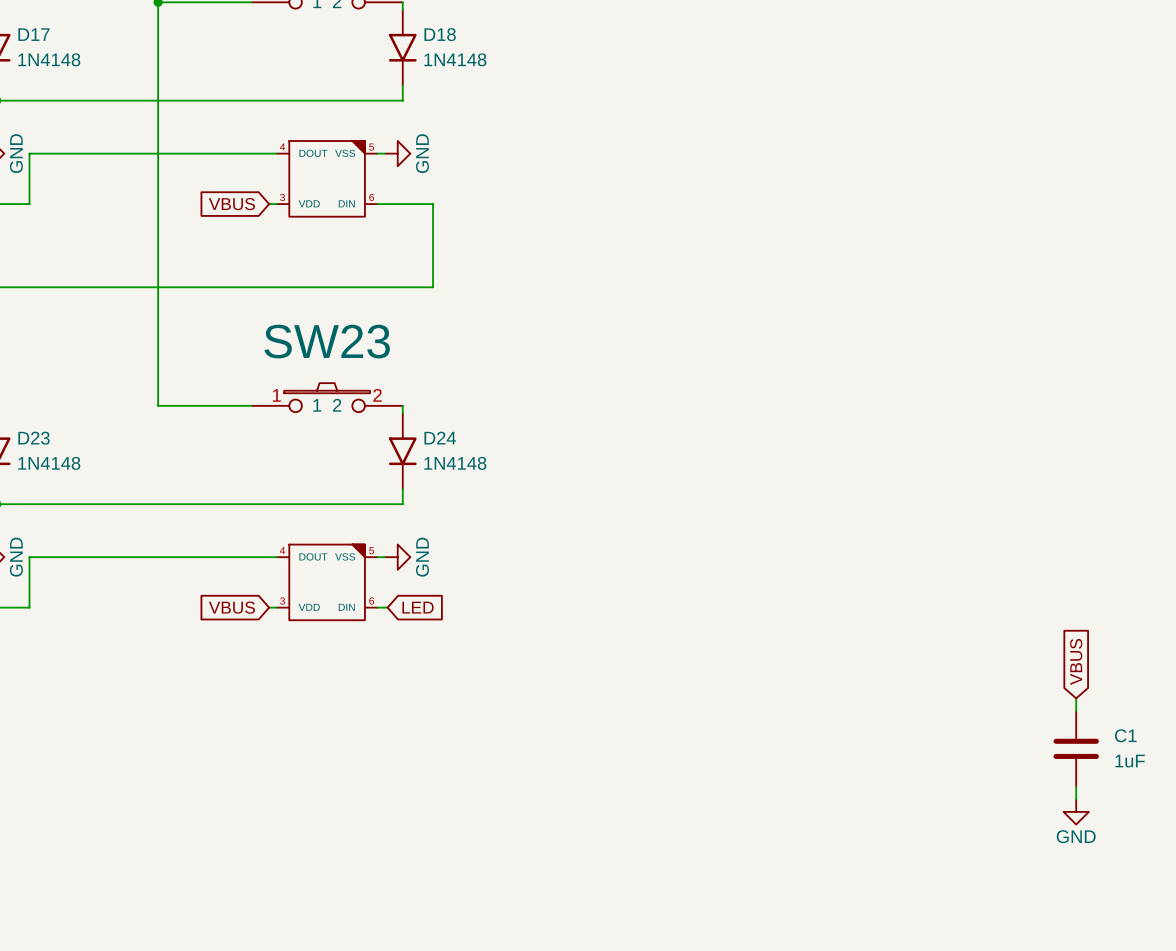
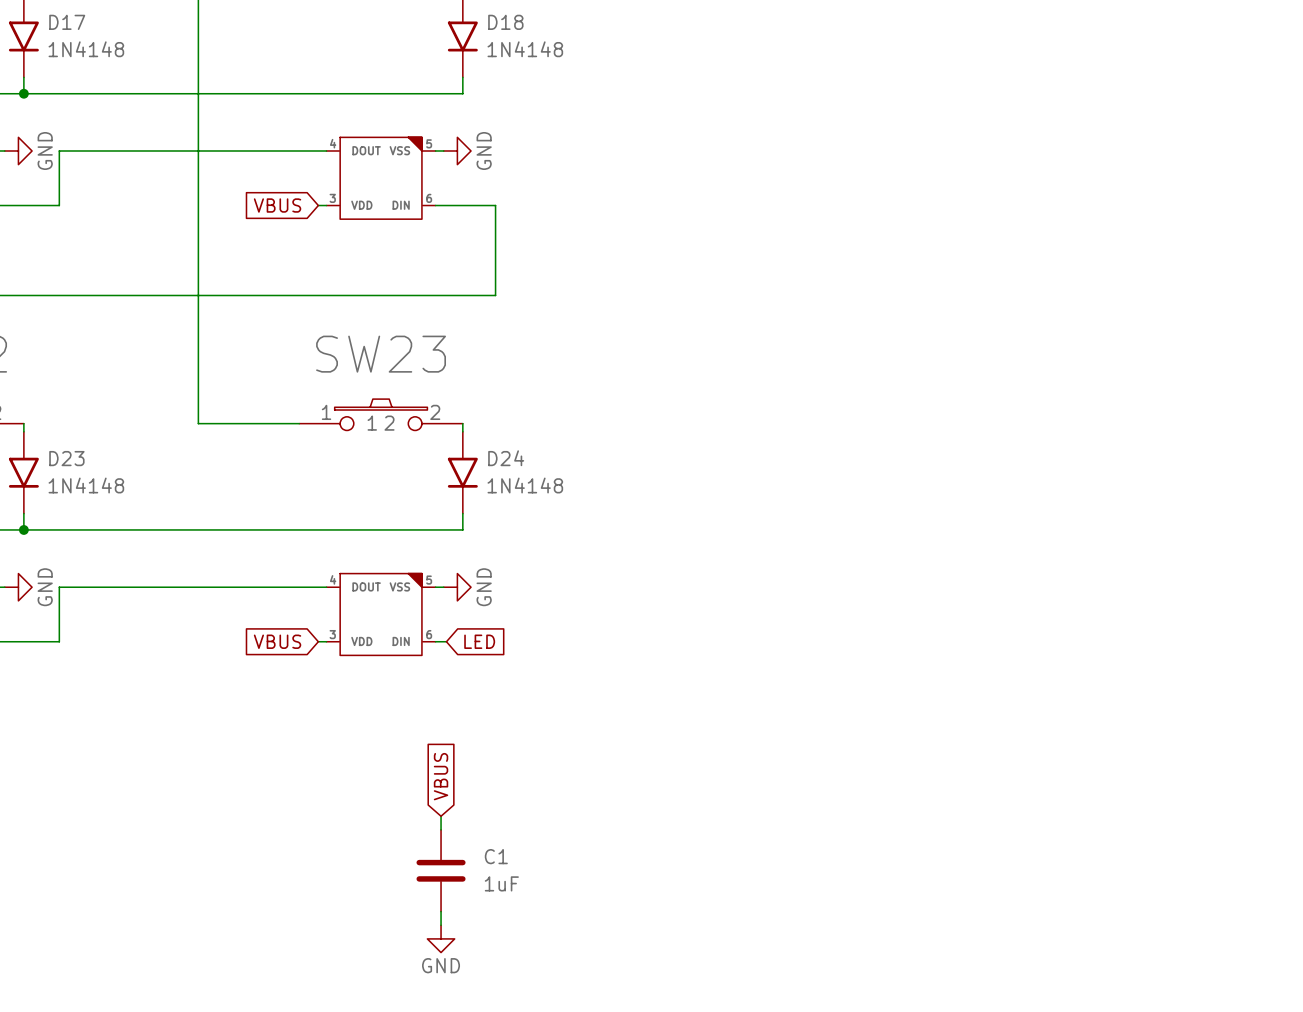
global label: VBUS (1076, 661) -> none
wire: (1076, 698) (1076, 711) -> none
global label: none -> VBUS (441, 776)
C1 position: (1076, 748) -> (441, 870)
wire: none -> (441, 816) (441, 829)
wire: (1076, 786) (1076, 799) -> none
power symbol: GND (1076, 811) -> none
wire: none -> (441, 911) (441, 925)
power symbol: none -> GND (441, 938)

